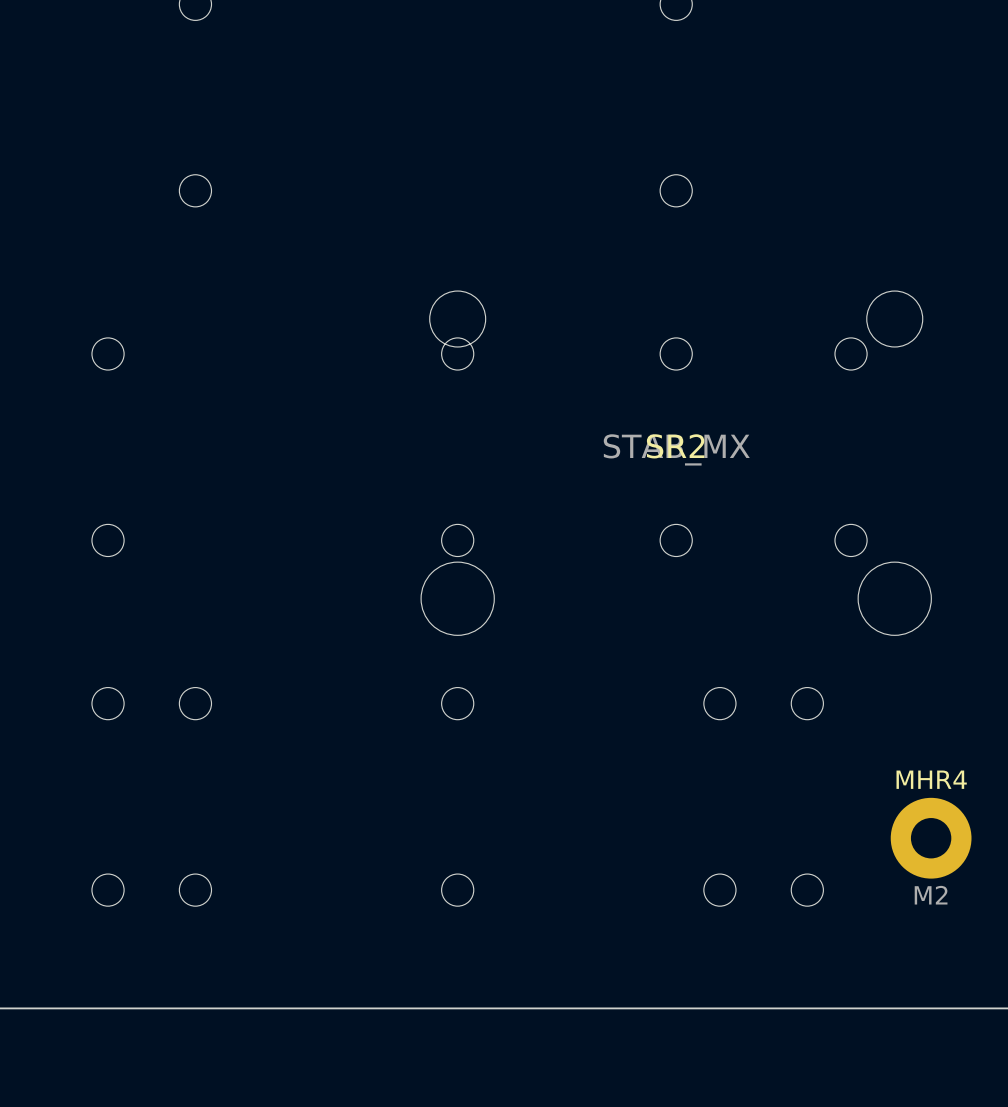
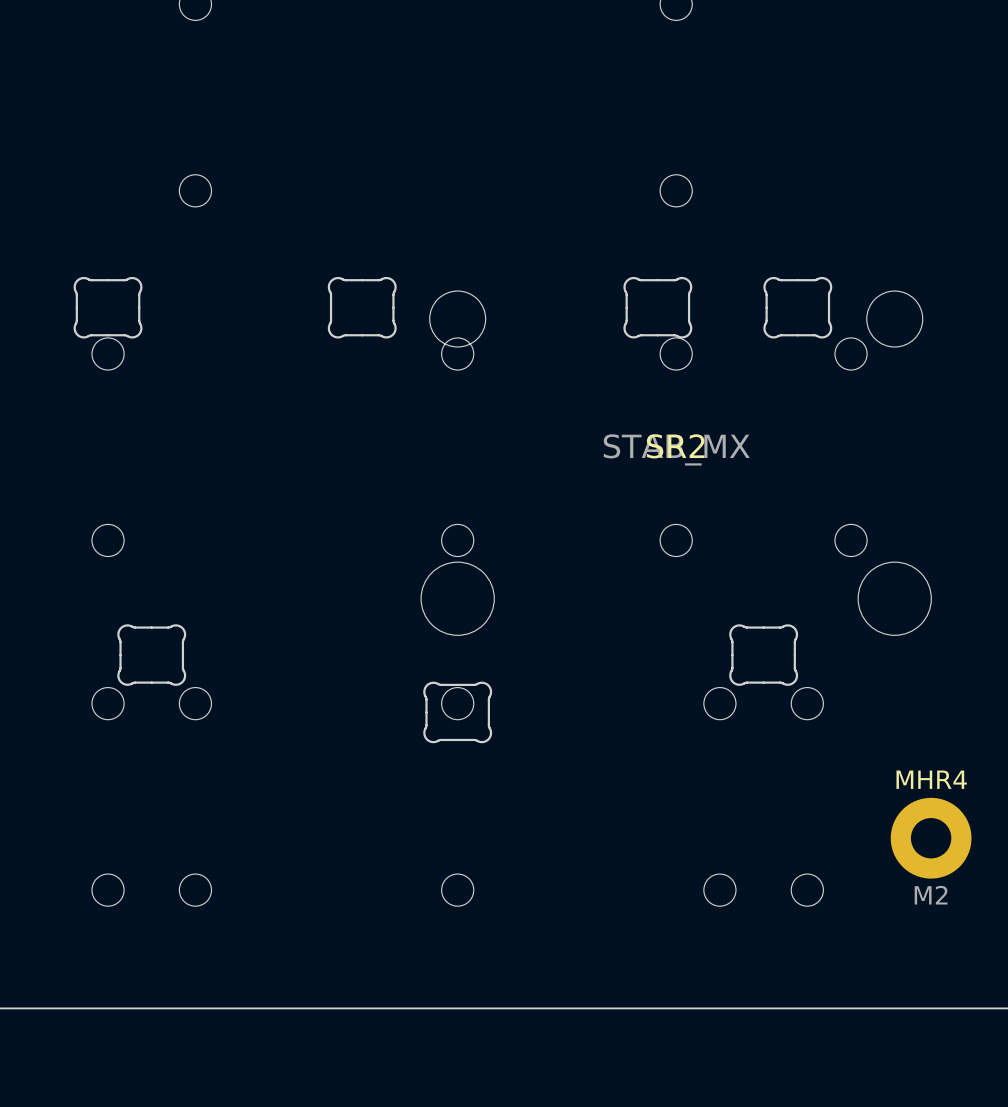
part: none -> (108, 307)
part: none -> (362, 307)
part: none -> (657, 307)
part: none -> (797, 307)
part: none -> (151, 655)
part: none -> (763, 655)
part: none -> (457, 712)

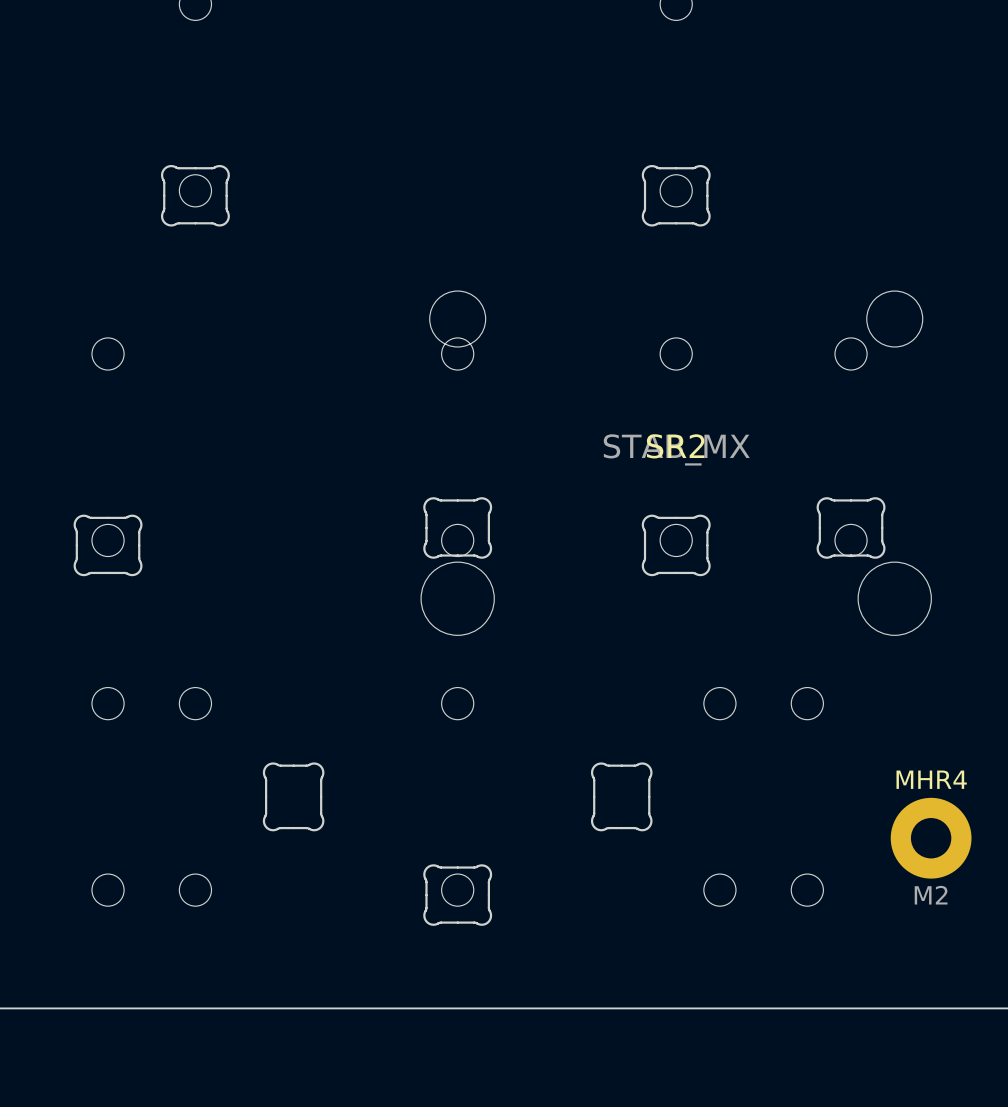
part: none -> (195, 195)
part: none -> (676, 195)
part: (108, 307) -> none
part: (362, 307) -> none
part: (657, 307) -> none
part: (797, 307) -> none
part: none -> (457, 527)
part: none -> (851, 527)
part: none -> (108, 545)
part: none -> (676, 545)
part: (151, 655) -> none
part: (763, 655) -> none
part: (457, 712) -> none
part: none -> (293, 796)
part: none -> (621, 796)
part: none -> (457, 895)

